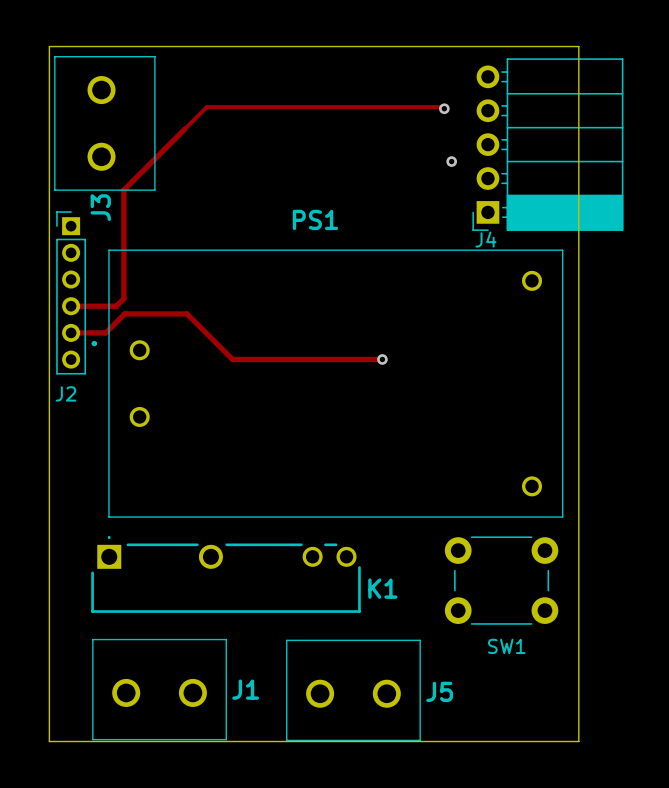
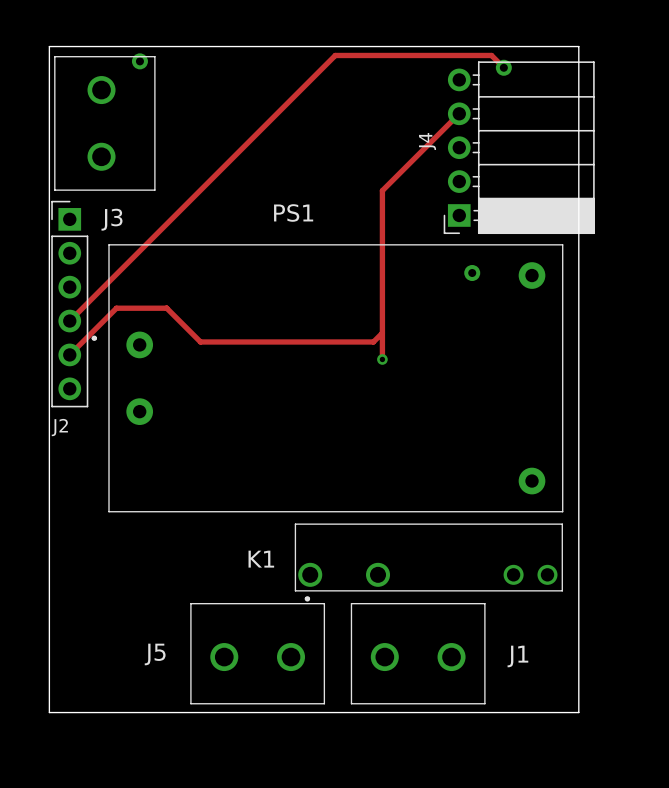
via: none -> (139, 61)
track: none -> (503, 67) (491, 55) (335, 55) (69, 321)
via: none -> (503, 67)
track: (444, 108) (442, 107) (206, 107) (123, 189) (123, 298) (116, 306) -> none
via: (444, 108) -> none
J4 position: (547, 144) -> (519, 147)
via: (451, 161) -> none
J3 name rotation: 0° (100, 207) -> 90° clockwise (112, 219)
J2 footprint: [56, 211, 87, 375] -> [51, 200, 89, 408]
PS1 name position: PS1 (315, 219) -> PS1 (293, 212)
J4 name rotation: 0° (485, 239) -> 90° counterclockwise (427, 141)
J4 name position: J4 (485, 239) -> J4 (427, 141)
PS1 footprint: [91, 249, 564, 518] -> [91, 244, 564, 513]
via: none -> (472, 272)
track: (71, 306) (115, 306) -> none
track: none -> (166, 308) (200, 341) (373, 341) (382, 333)
track: none -> (166, 308) (116, 308) (69, 354)
track: (71, 332) (105, 332) (124, 313) (187, 313) (232, 359) (382, 359) -> (459, 113) (382, 190) (382, 359)
K1 footprint: [91, 536, 361, 613] -> [294, 523, 563, 602]
SW1: (501, 580) -> none
K1 name position: K1 (382, 588) -> K1 (261, 559)
J1 position: (159, 689) -> (418, 653)
J1 name position: J1 (245, 689) -> J1 (517, 656)
J5 position: (353, 690) -> (257, 653)
J5 name position: J5 (439, 691) -> J5 (155, 654)
board edge: (49, 712) (49, 741) (578, 741) (578, 712) -> (49, 712) (578, 712)

